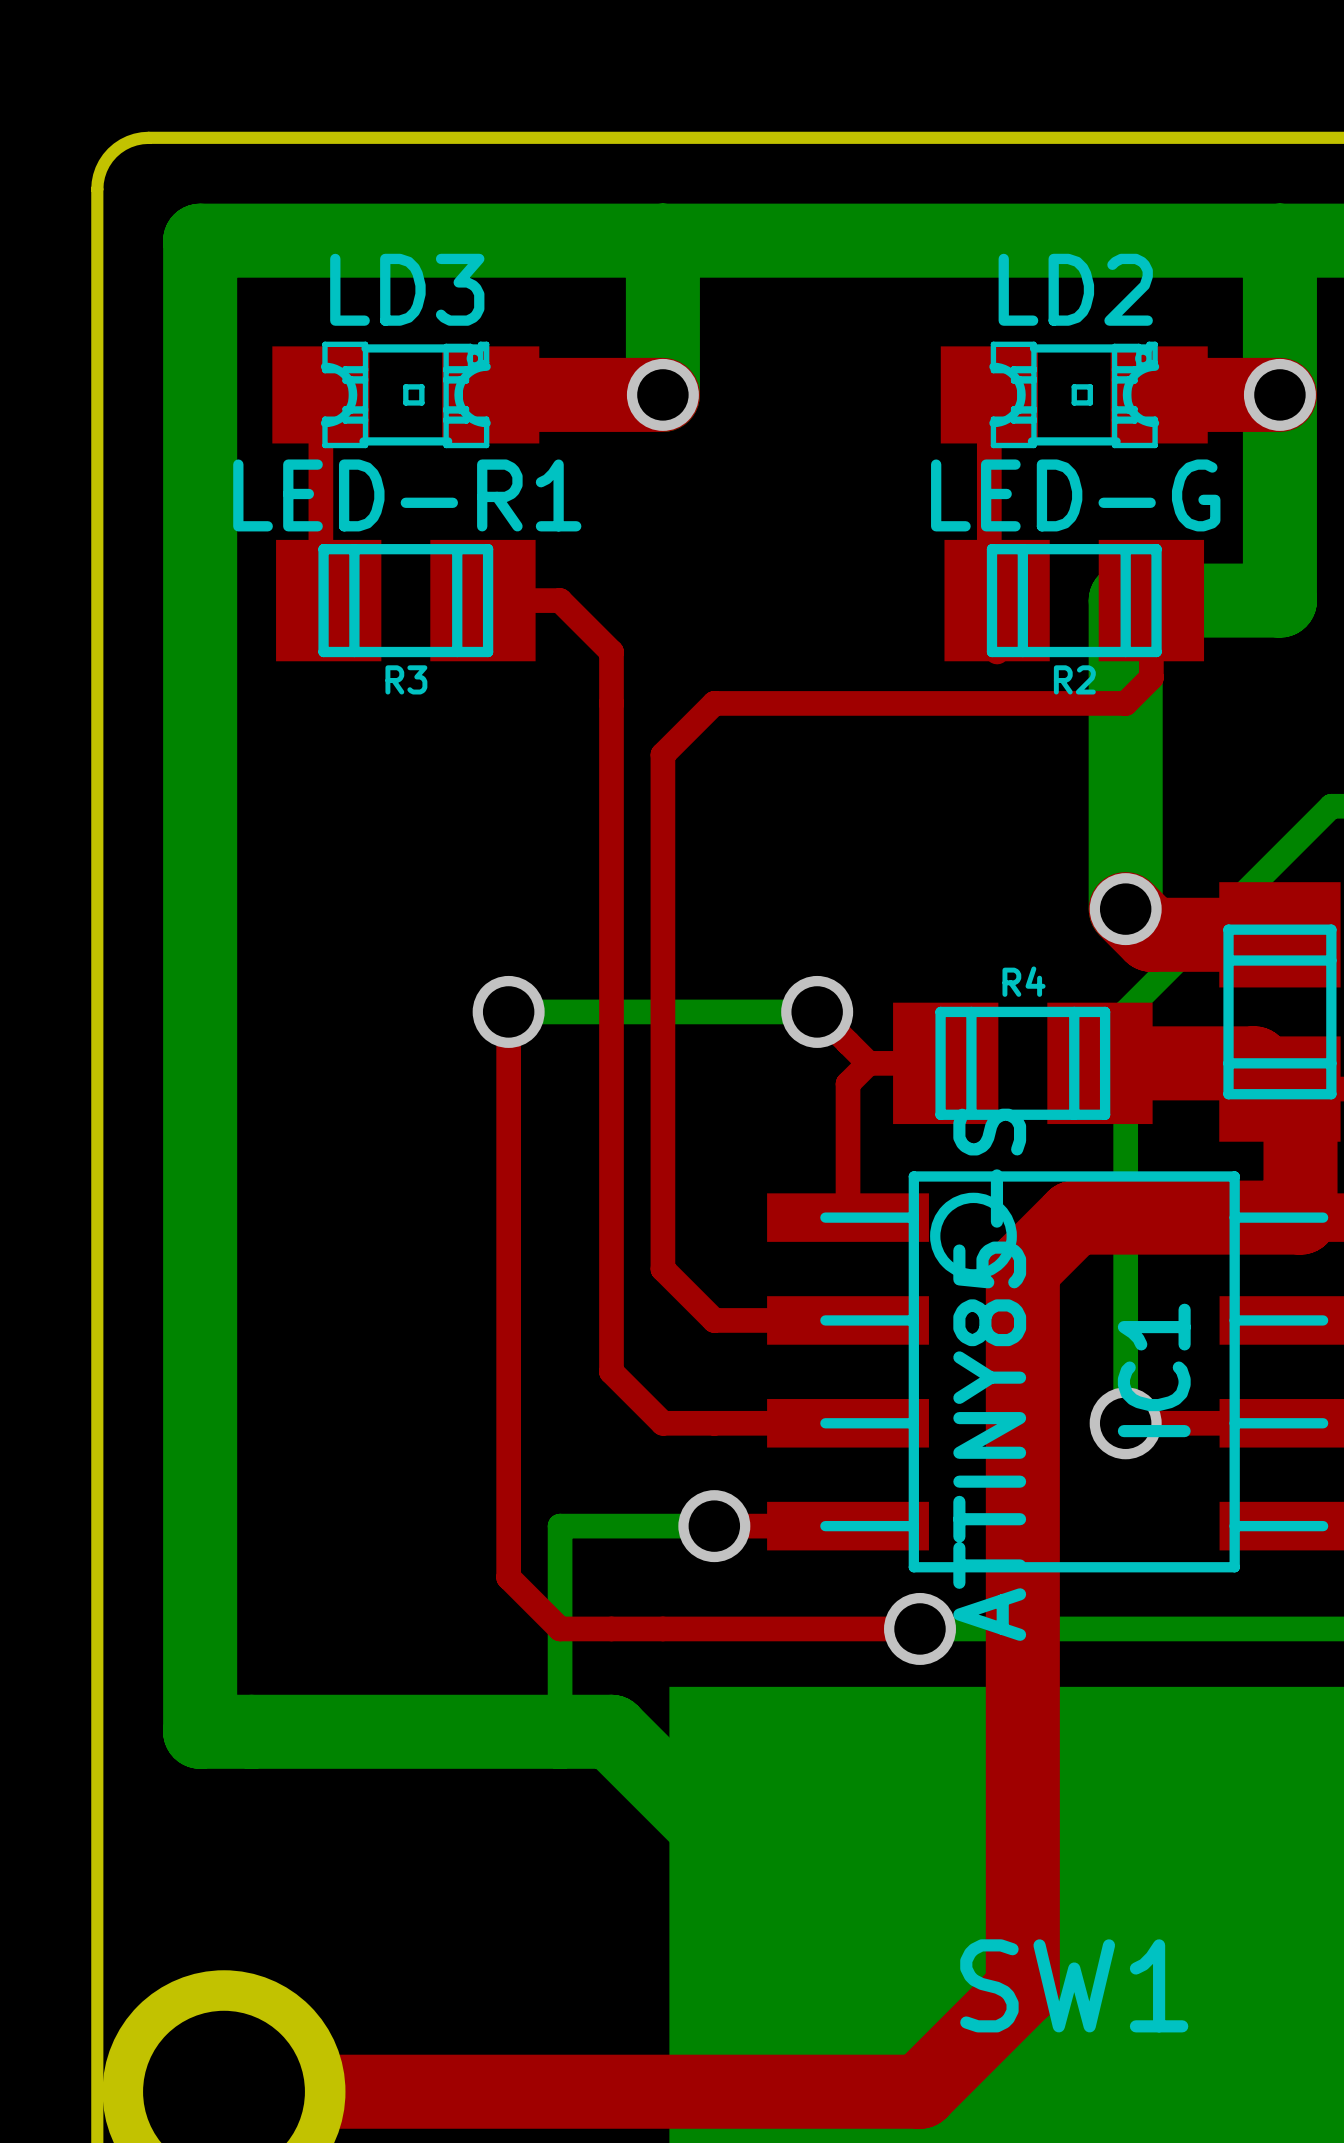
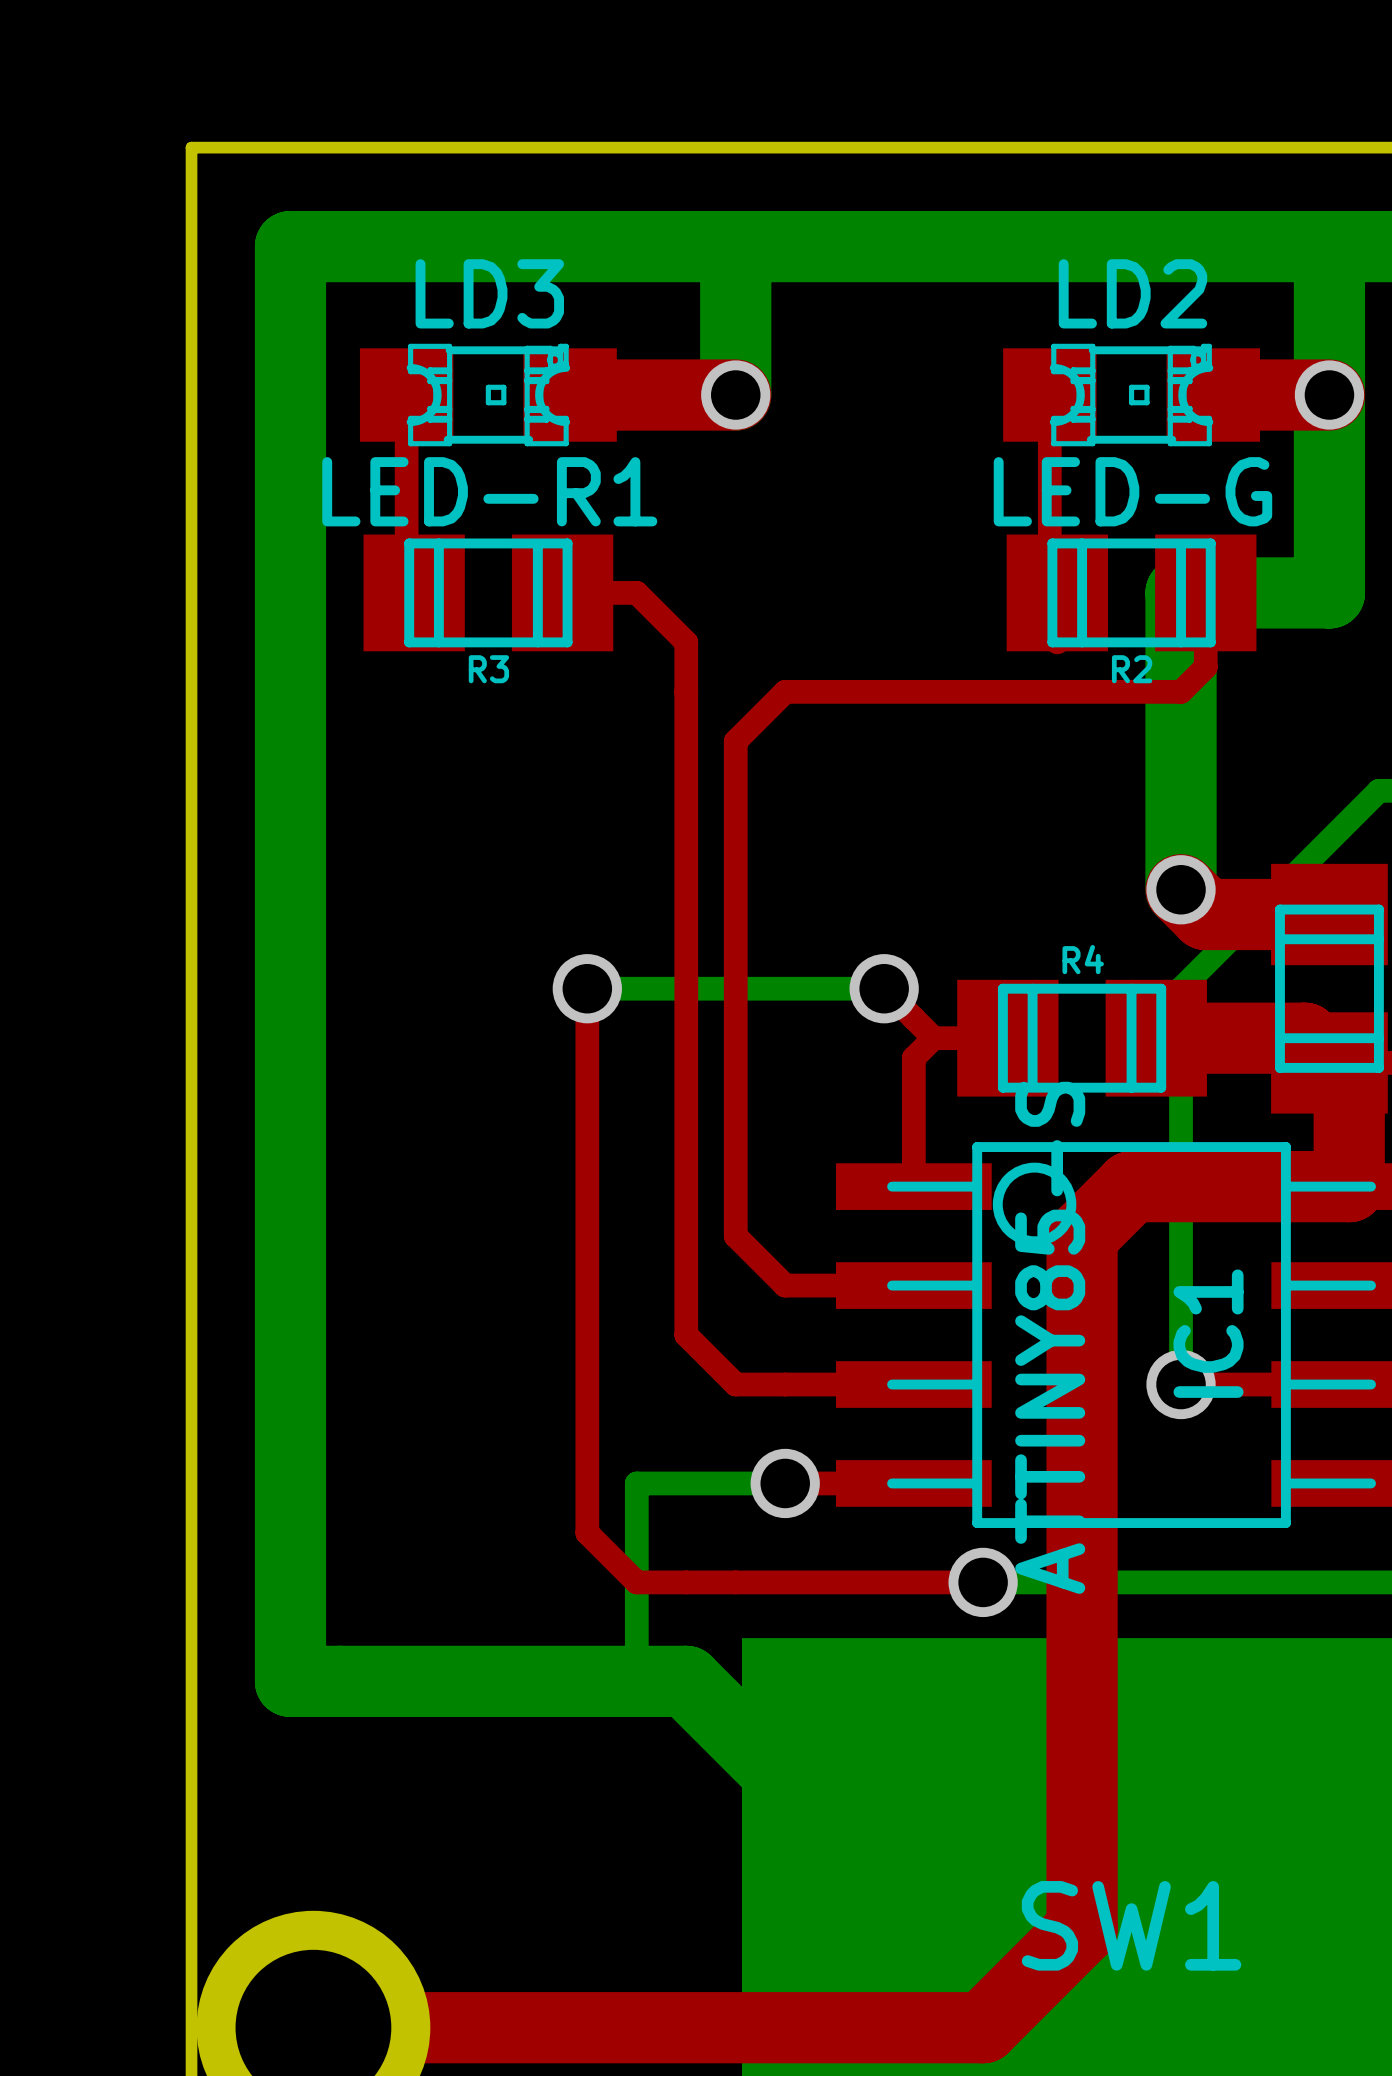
board edge: (148, 137) (129, 141) (112, 152) (101, 169) (97, 189) -> (241, 147) (191, 147) (191, 197)

